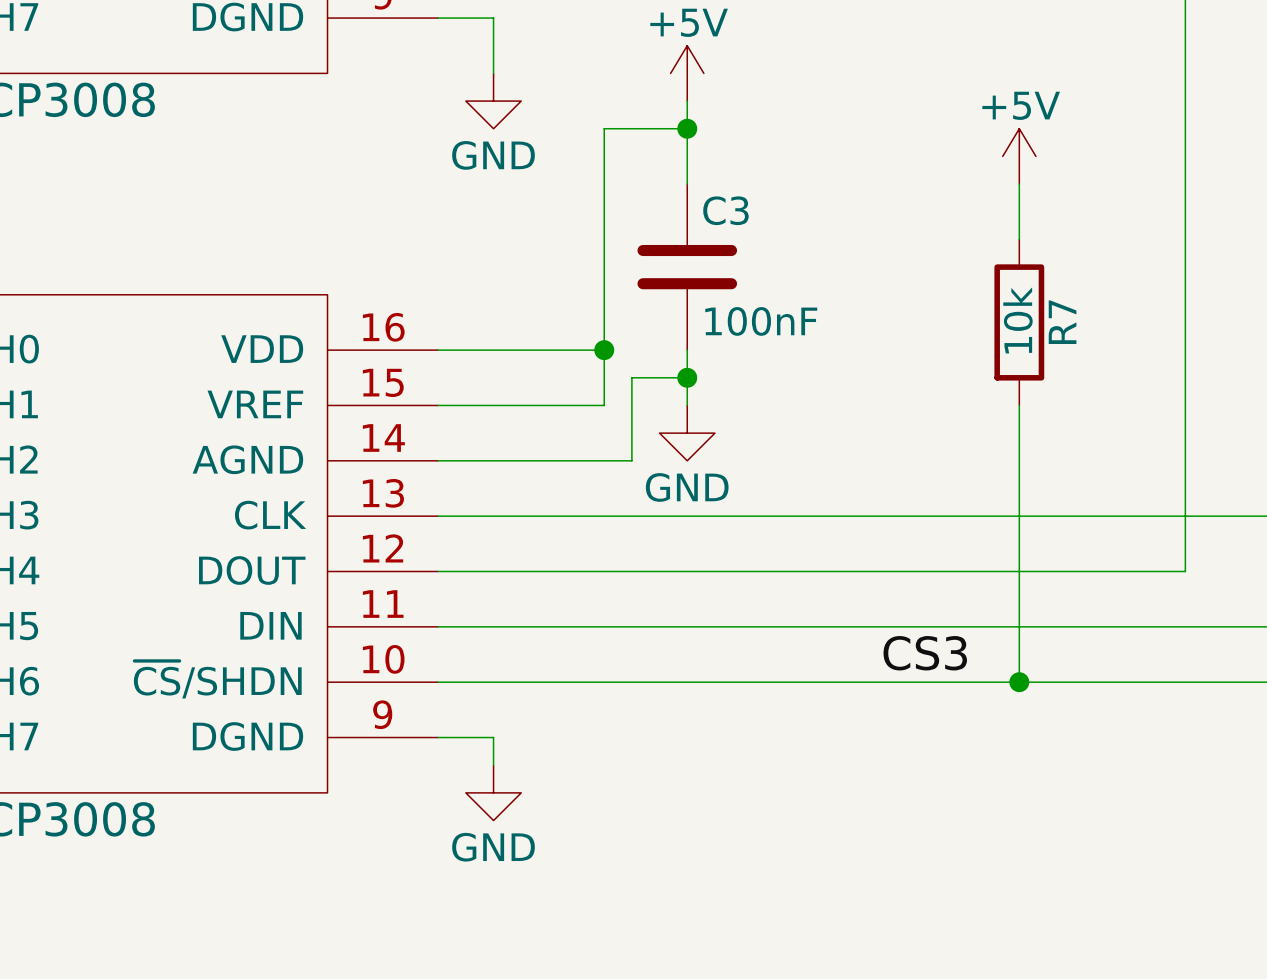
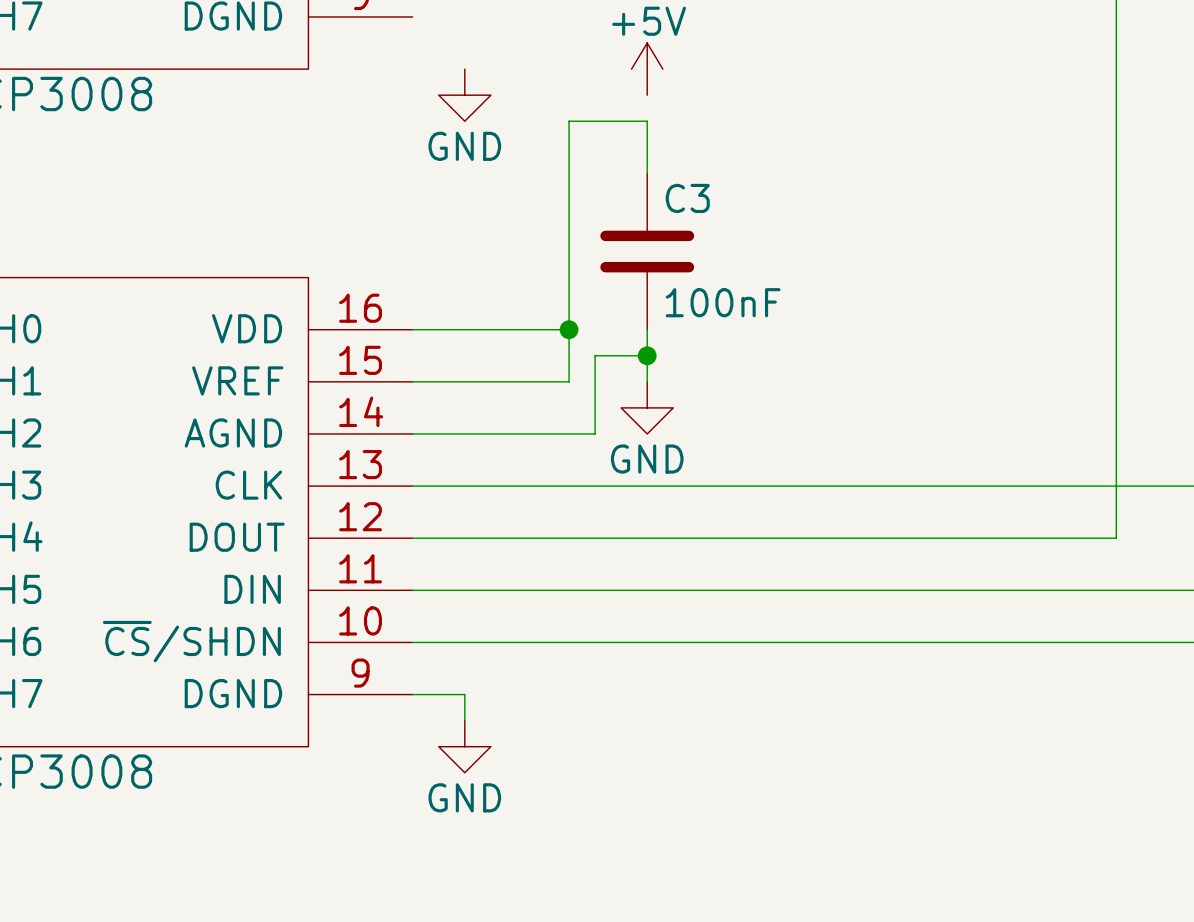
wire: (438, 18) (493, 18) (493, 73) -> none
wire: (687, 101) (687, 128) -> none
junction: (687, 128) -> none
power symbol: +5V (1019, 156) -> none
wire: (1019, 184) (1019, 239) -> none
R7: 10k (1019, 322) -> none
wire: (1019, 405) (1019, 682) -> none
label: CS3 (925, 653) -> none
junction: (1019, 682) -> none

